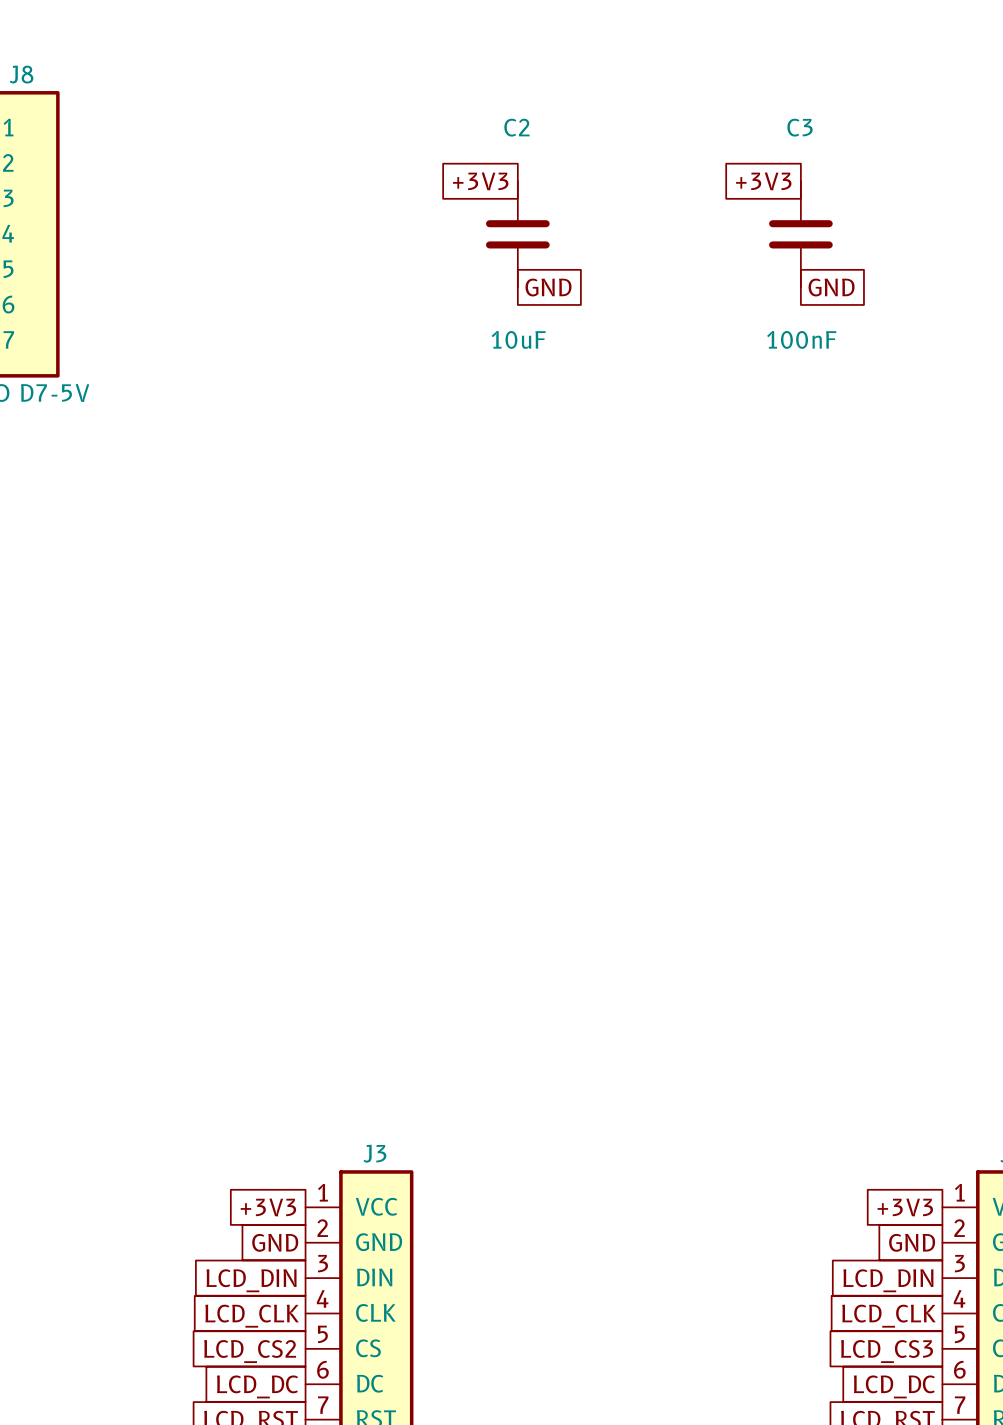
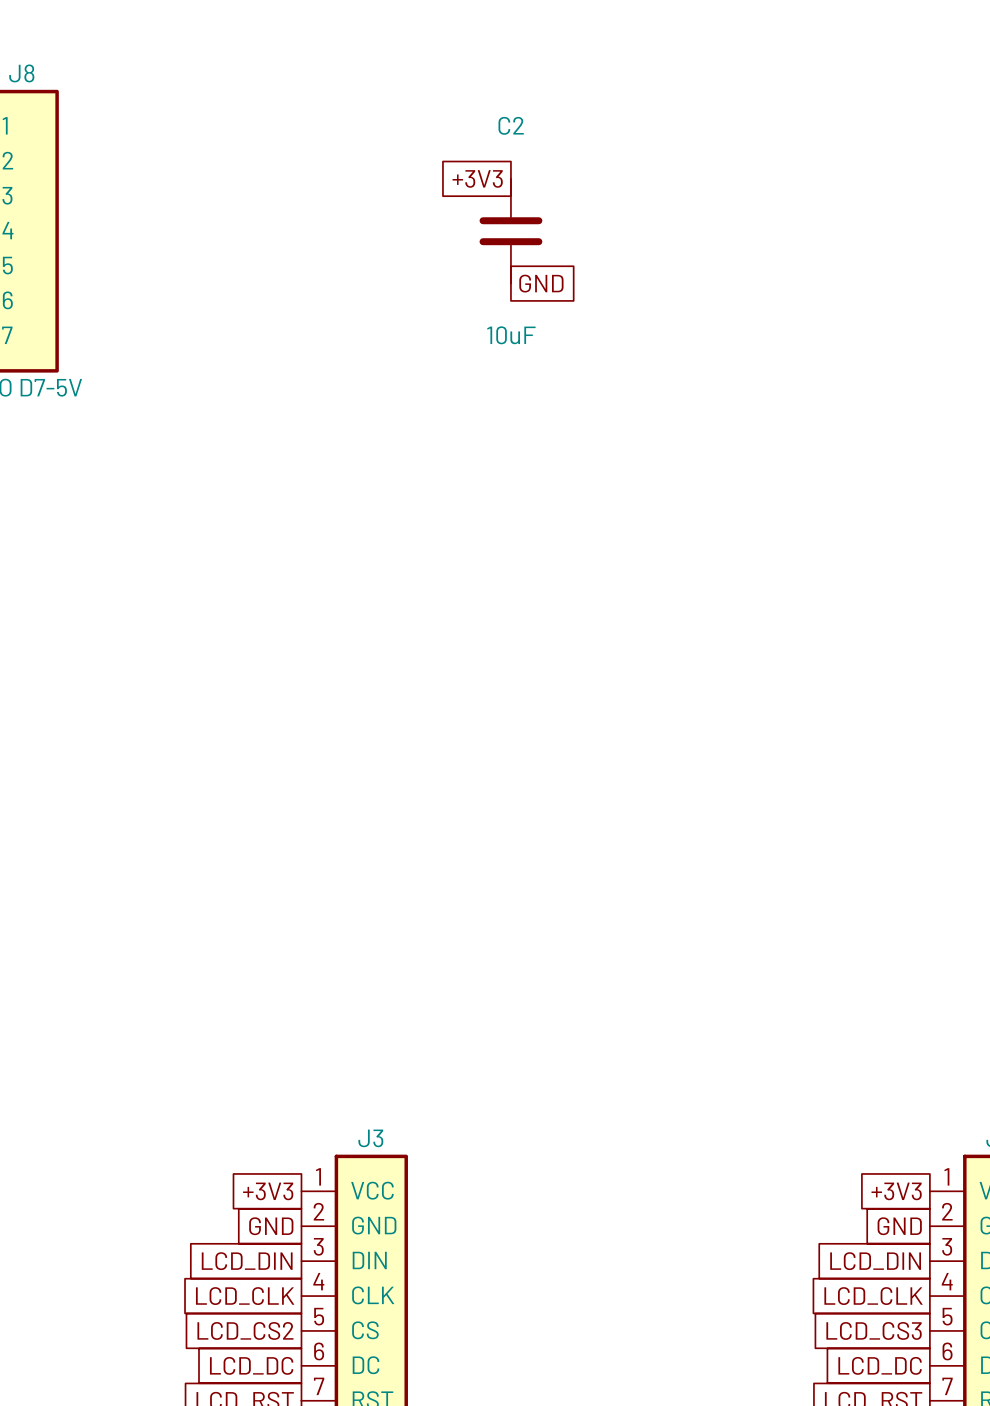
global label: +3V3 (763, 181) -> none
C3: 100nF (800, 234) -> none
global label: GND (831, 287) -> none

